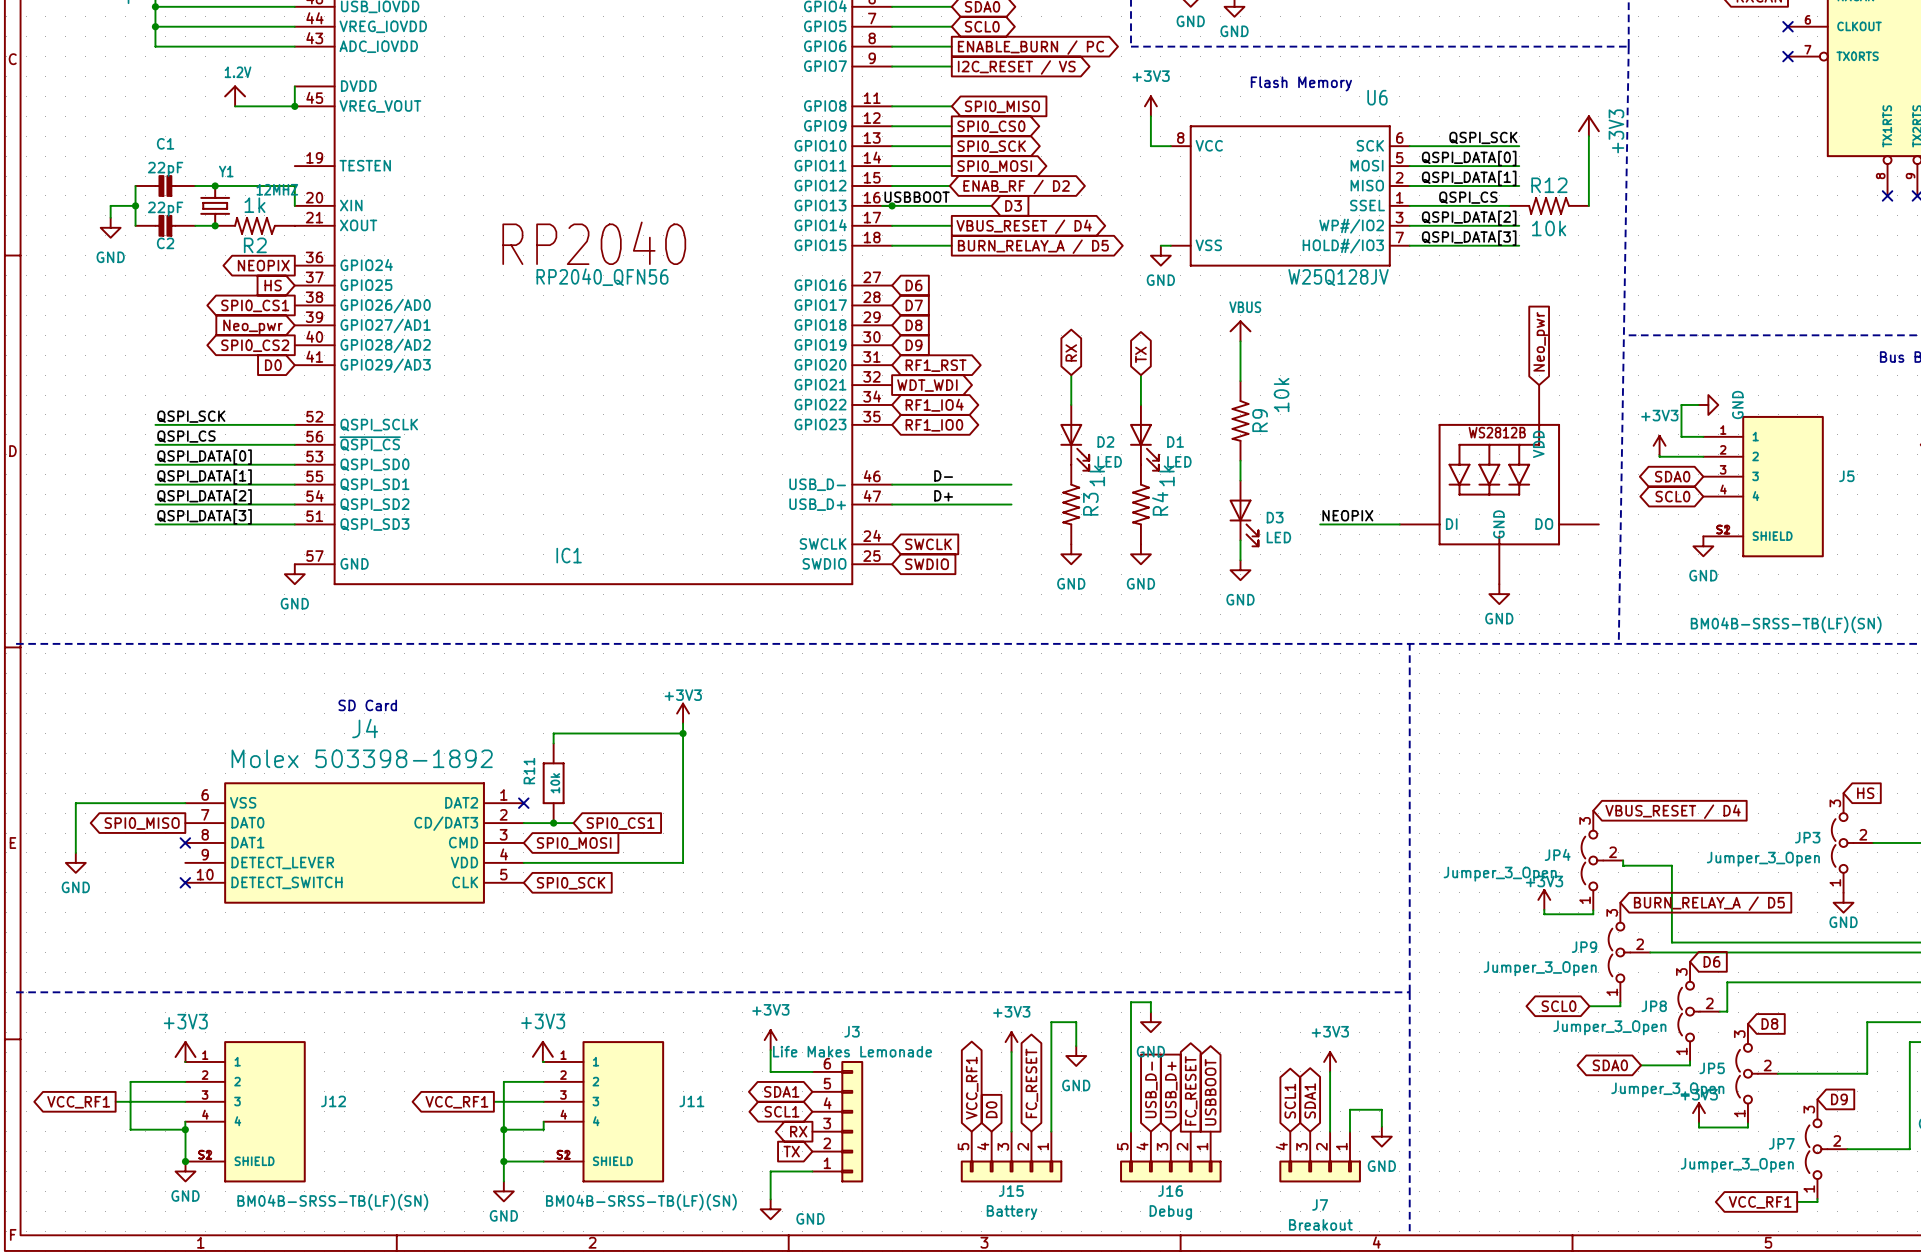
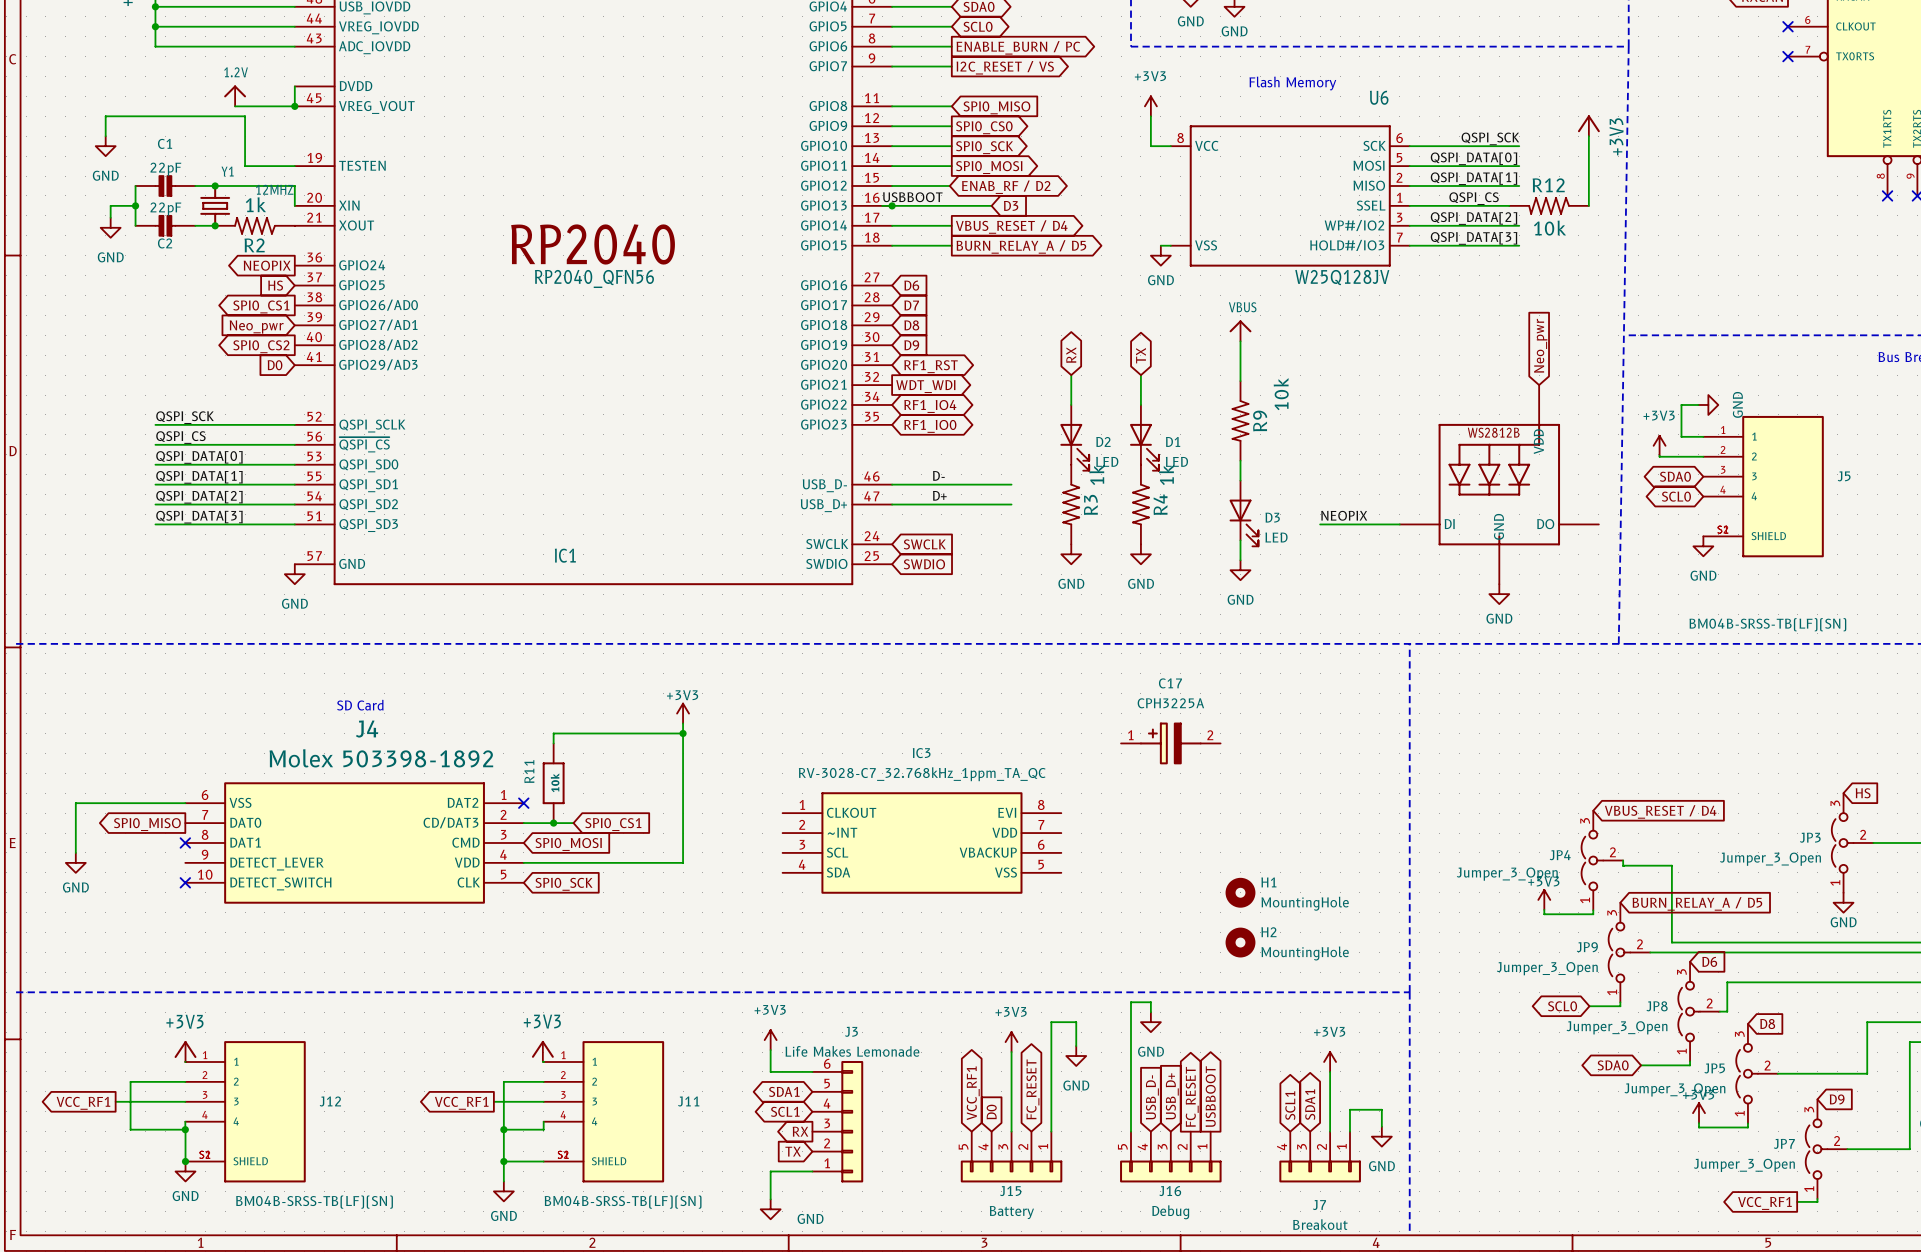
wire: none -> (105, 136) (105, 116) (245, 116) (245, 166) (294, 166)
power symbol: none -> GND (105, 146)
C17: none -> CPH3225A (1170, 743)
IC3: none -> RV-3028-C7_32.768kHz_1ppm_TA_QC (921, 842)
H1: none -> MountingHole (1240, 892)
H2: none -> MountingHole (1240, 942)

